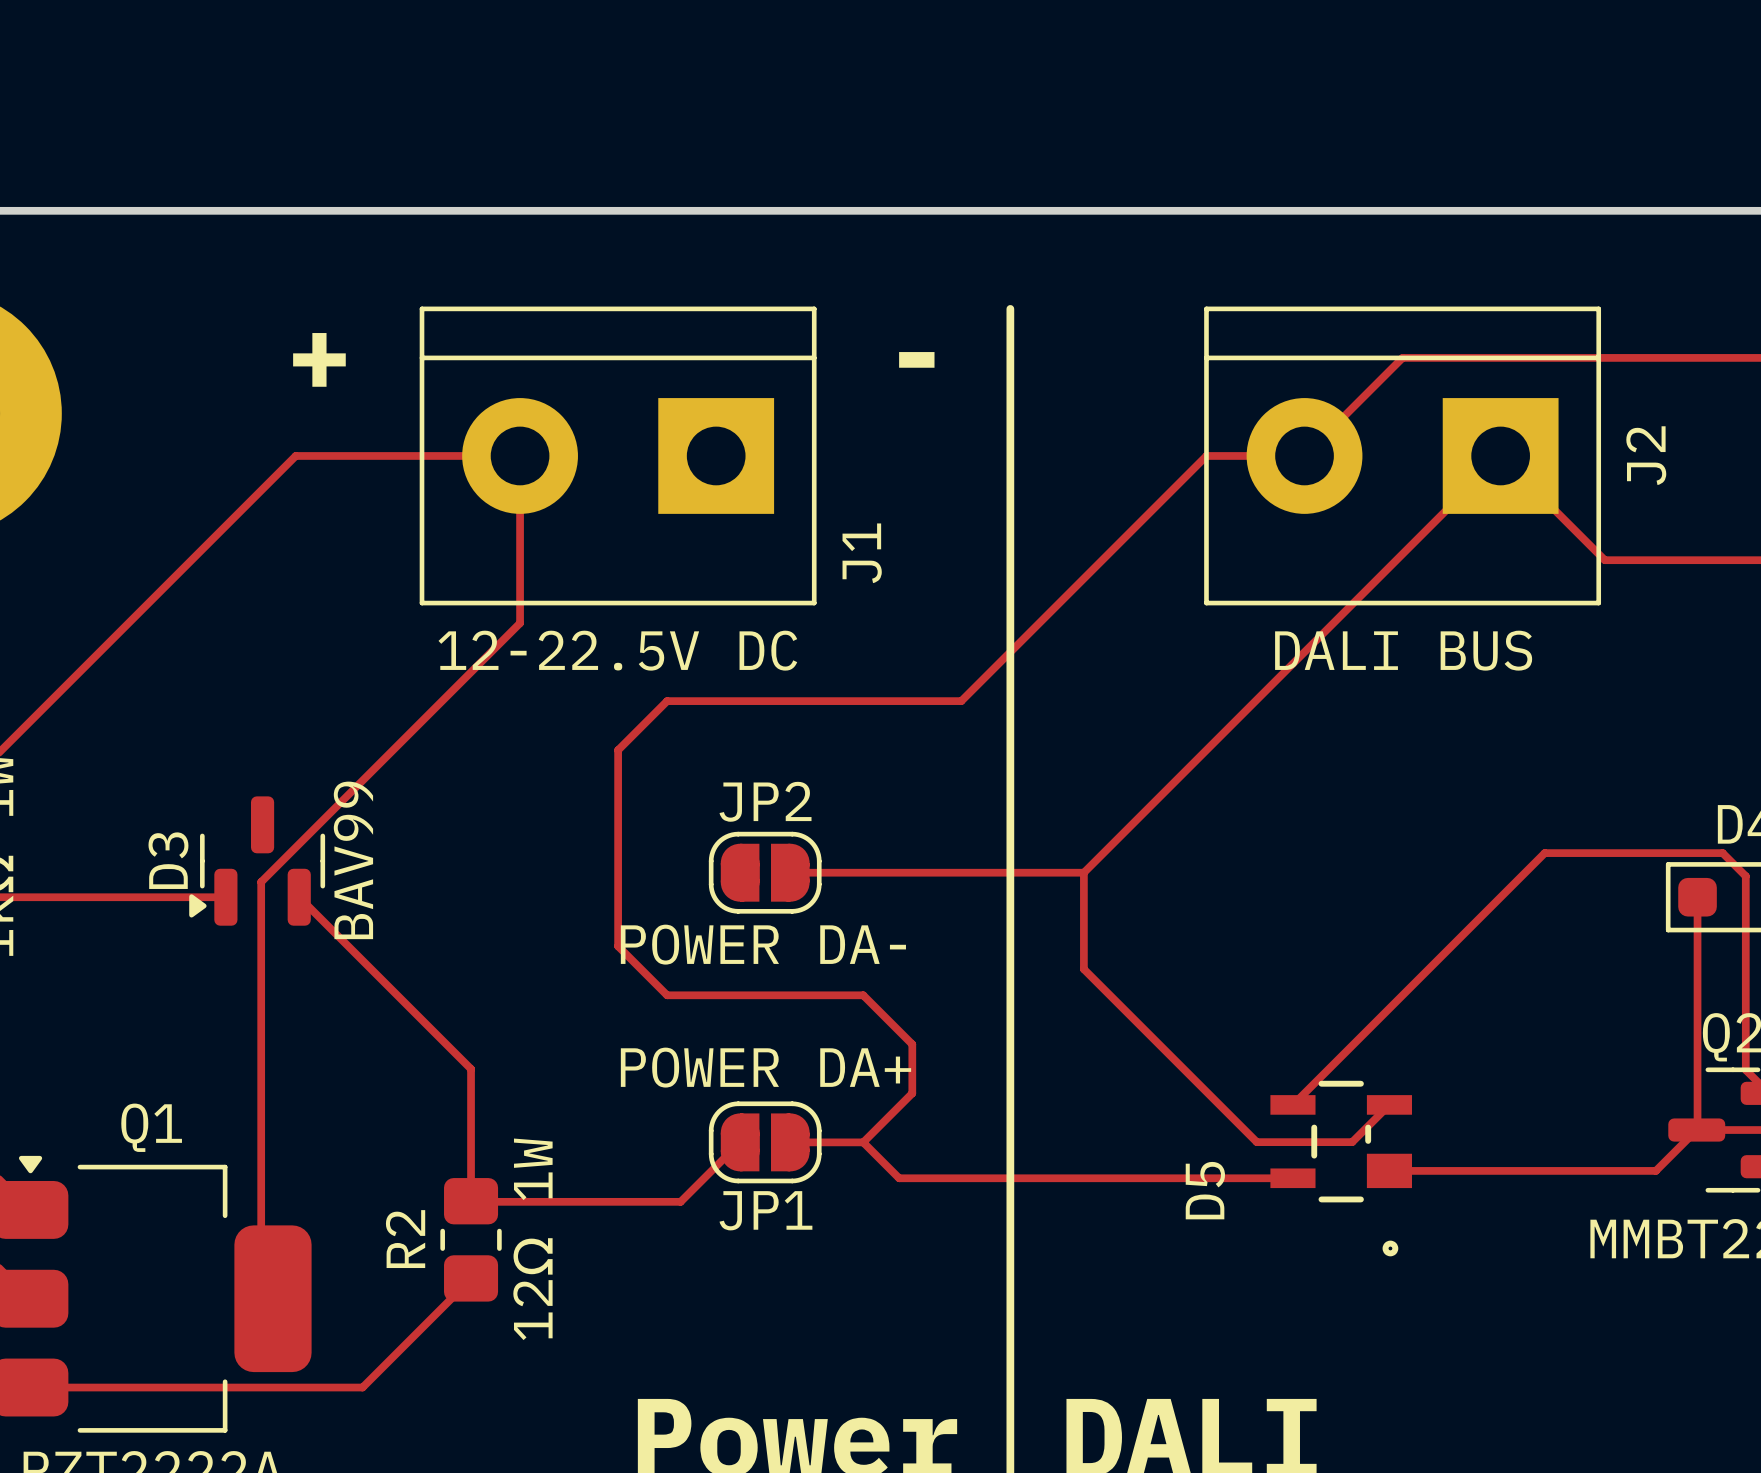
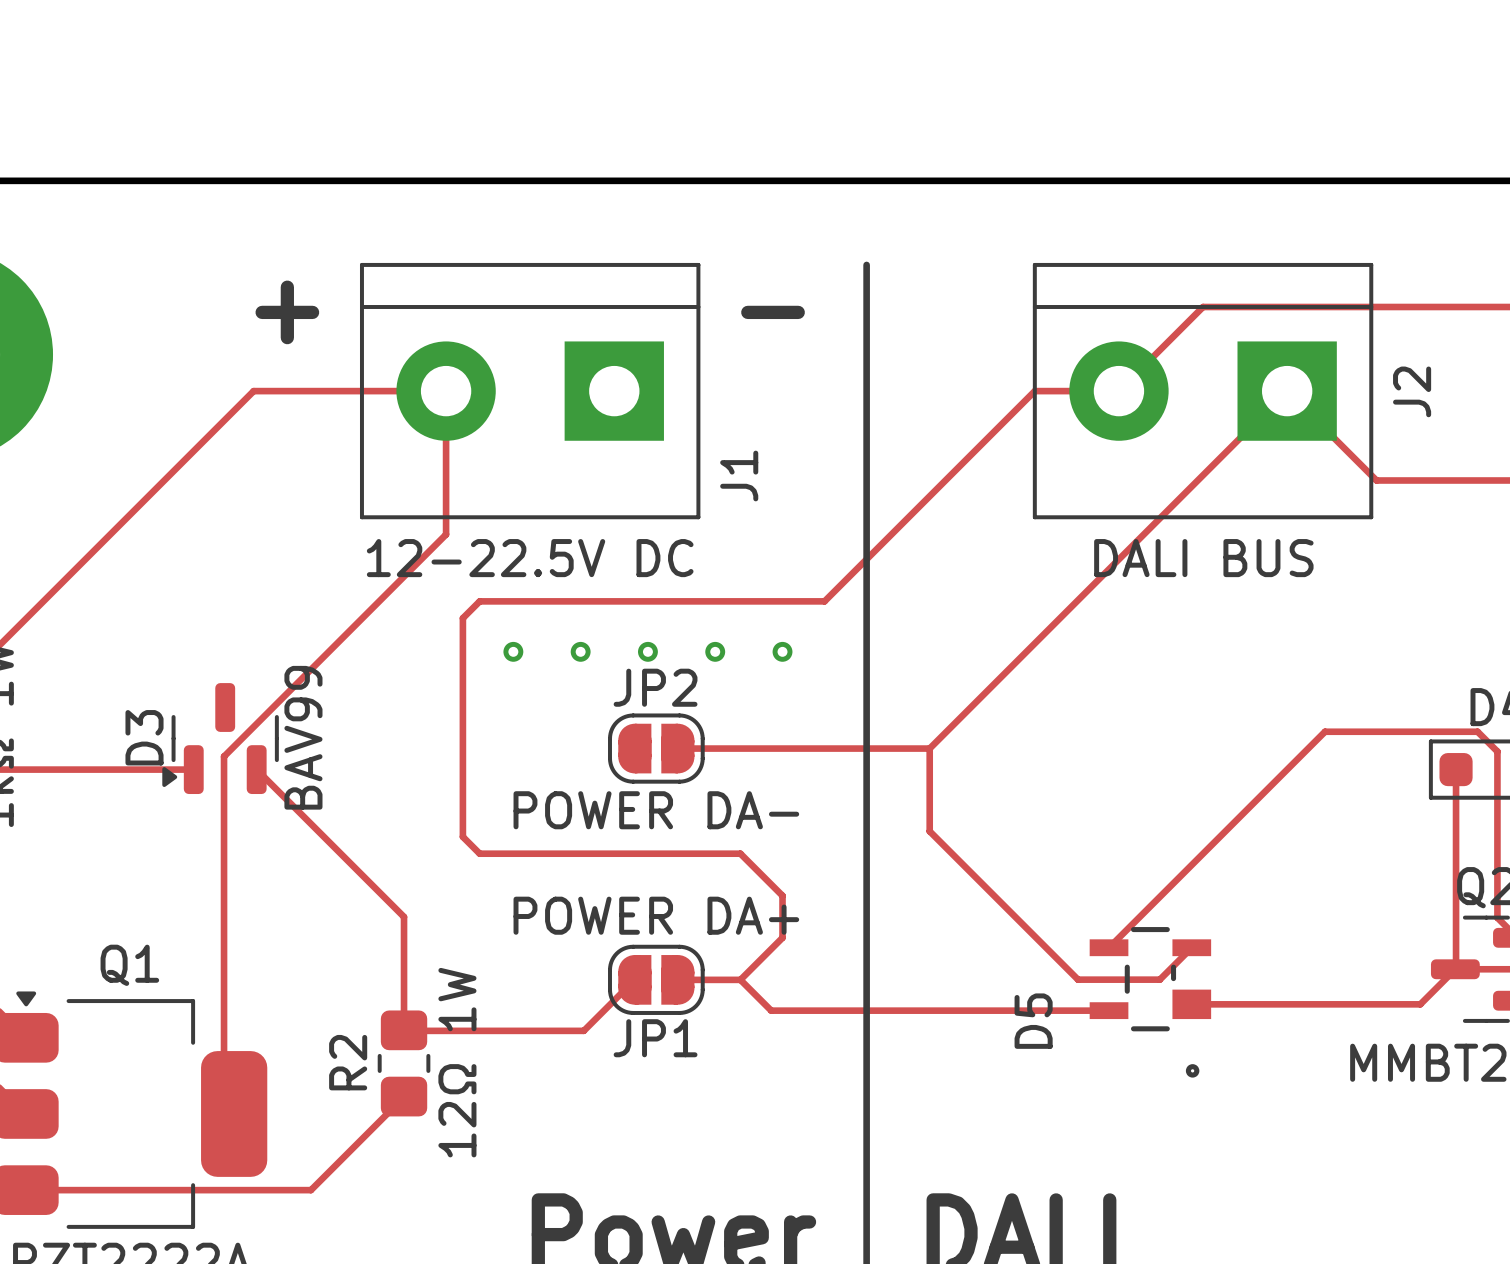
track: (667, 701) (618, 750) (618, 946) (667, 995) -> (572, 601) (479, 601) (462, 618) (462, 836) (479, 853) (572, 853)
via: none -> (513, 651)
via: none -> (580, 651)
via: none -> (647, 651)
via: none -> (715, 651)
via: none -> (782, 651)

